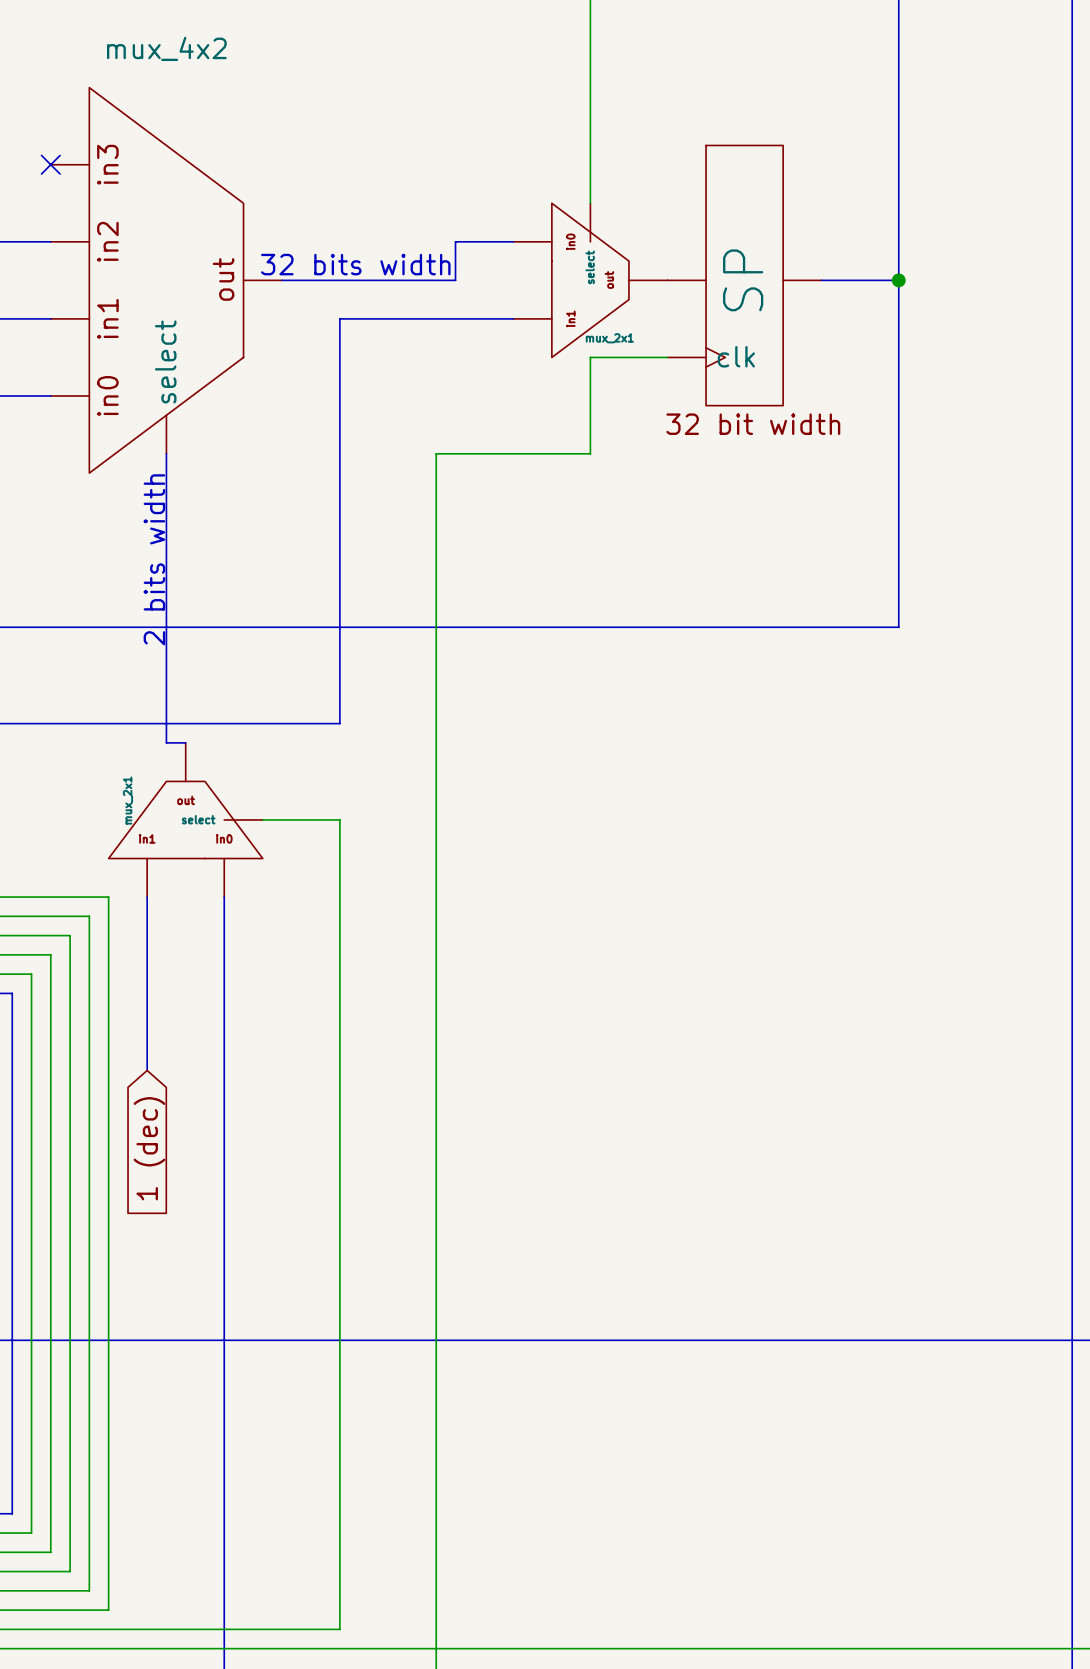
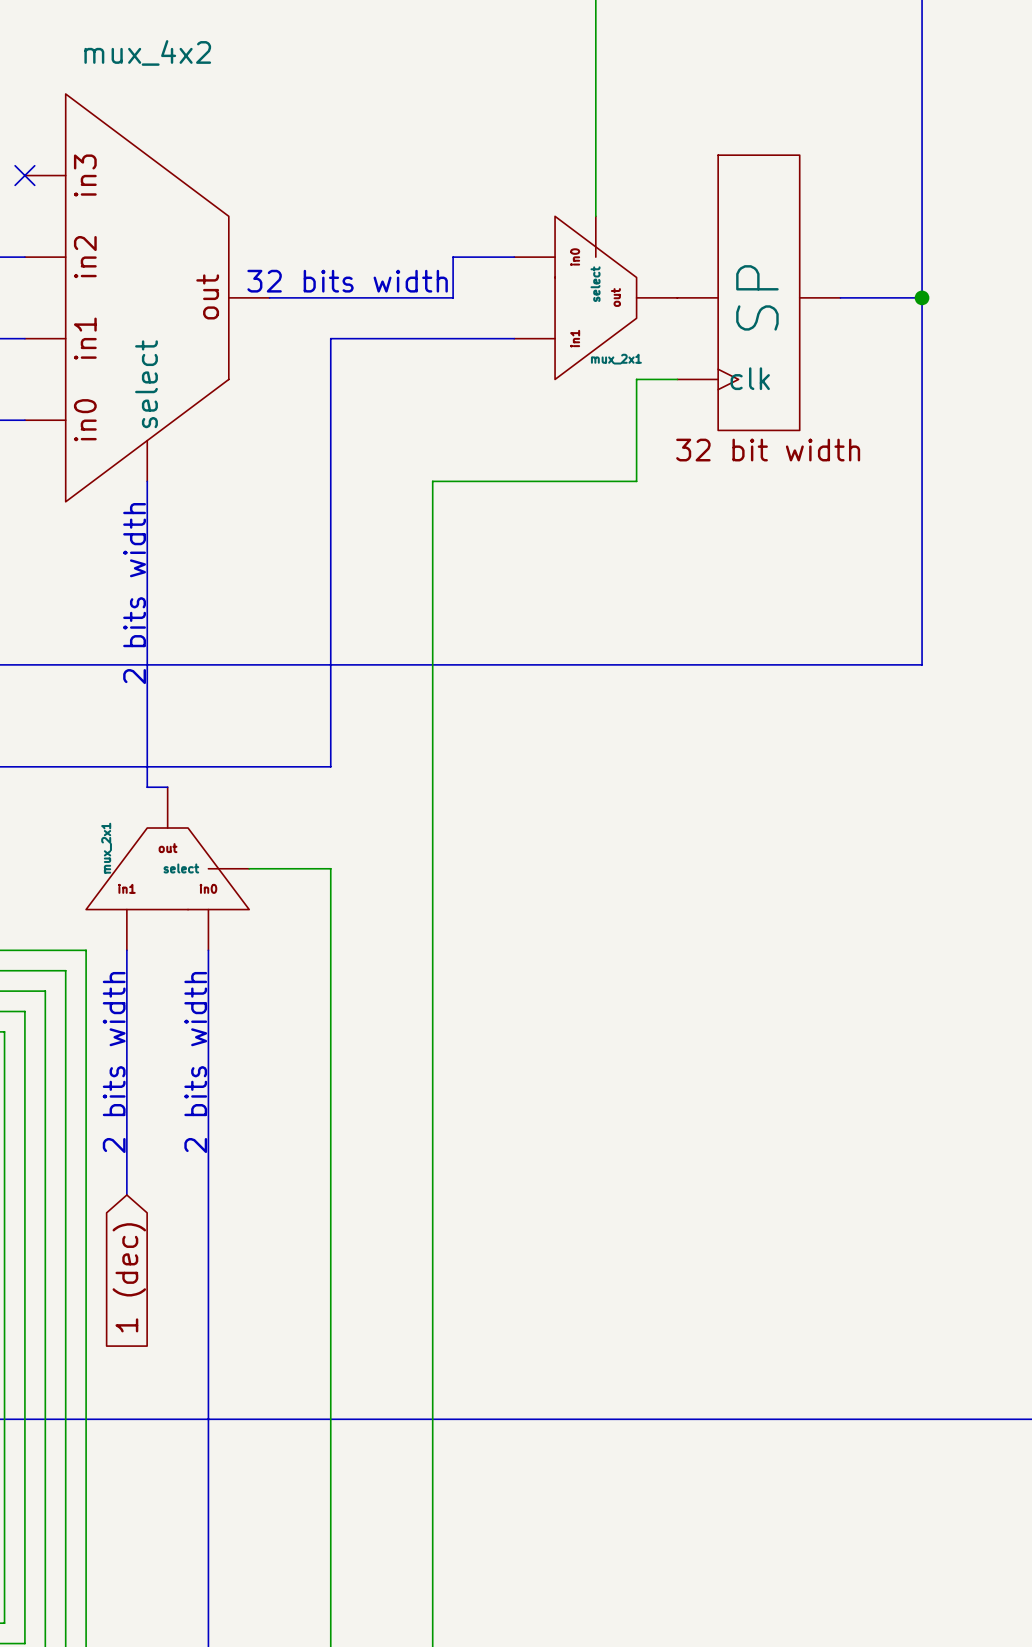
wire: (628, 357) (590, 357) (590, 453) -> (636, 379) (636, 481) (595, 481)
text: none -> 2 bits width (114, 1062)
text: none -> 2 bits width (195, 1062)
bus: none -> (126, 1133) (126, 1195)
global label position: 1 (dec) (149, 1148) -> 1 (dec) (129, 1277)

